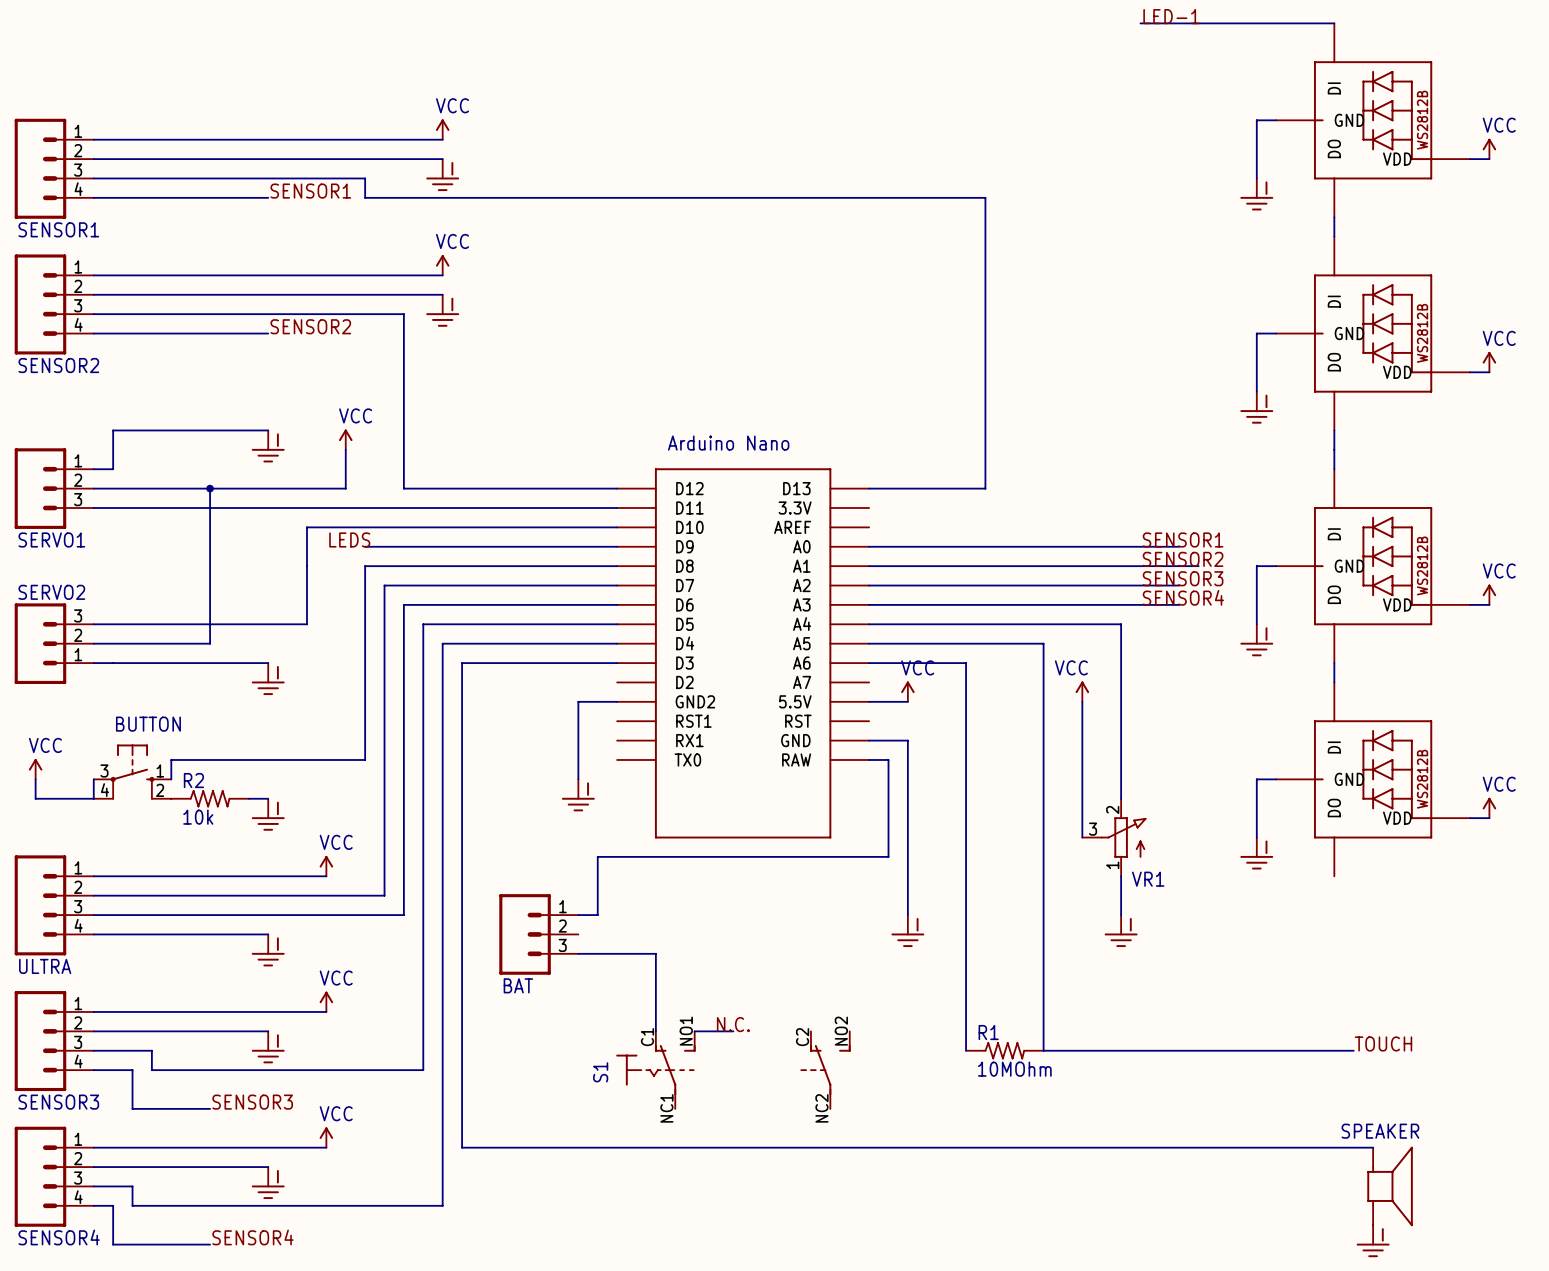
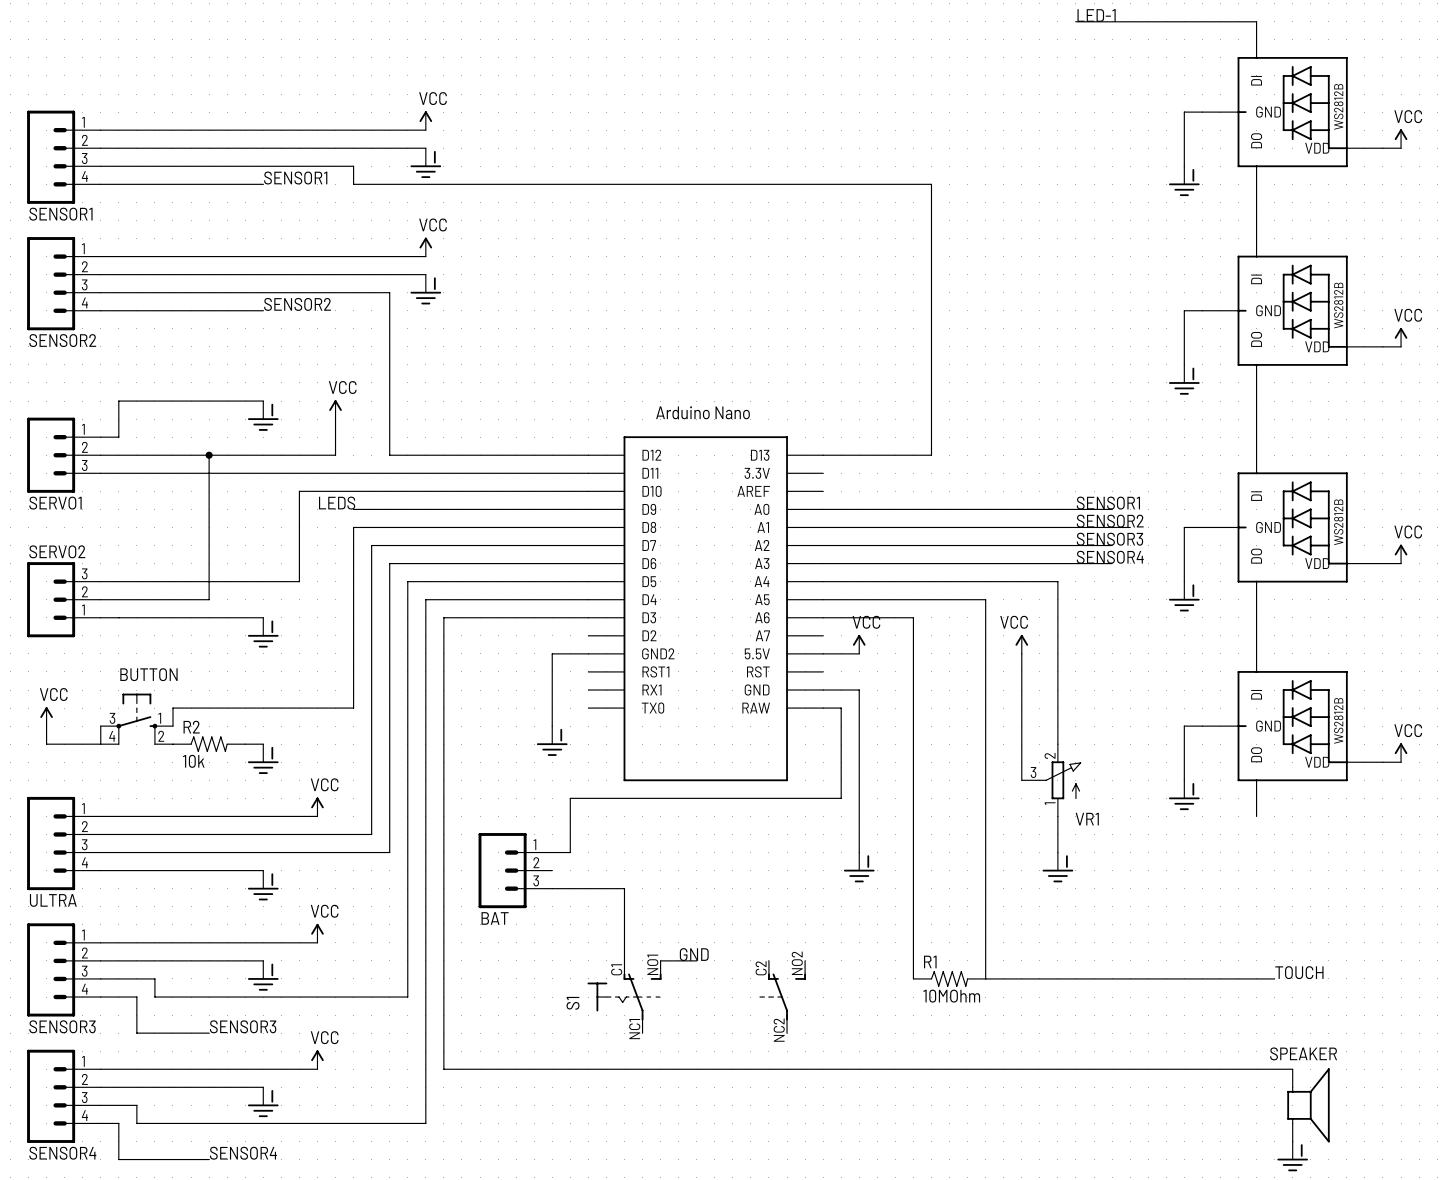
label: N.C. (733, 1024) -> GND (694, 954)

